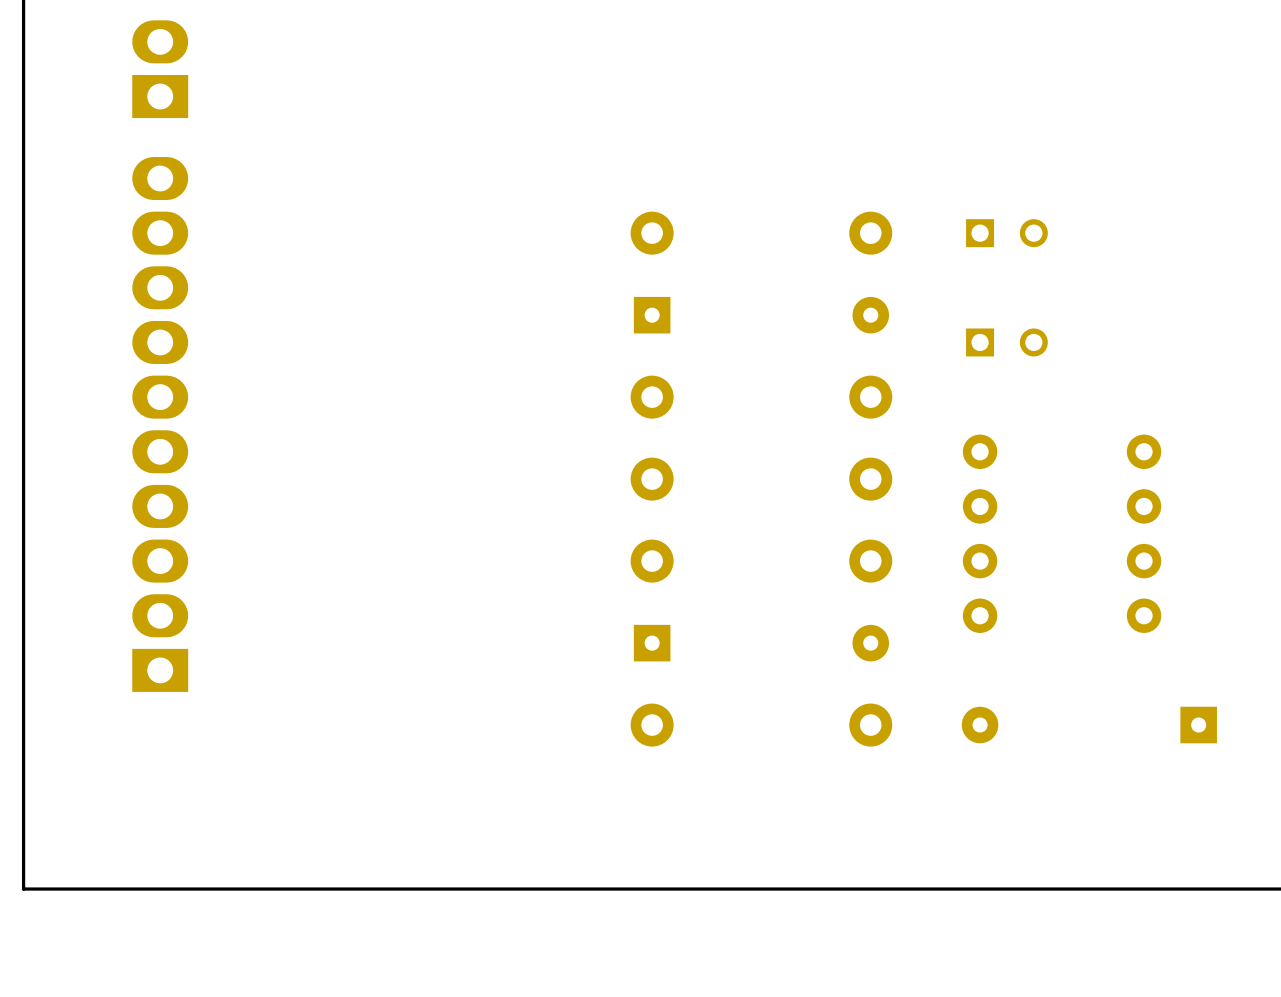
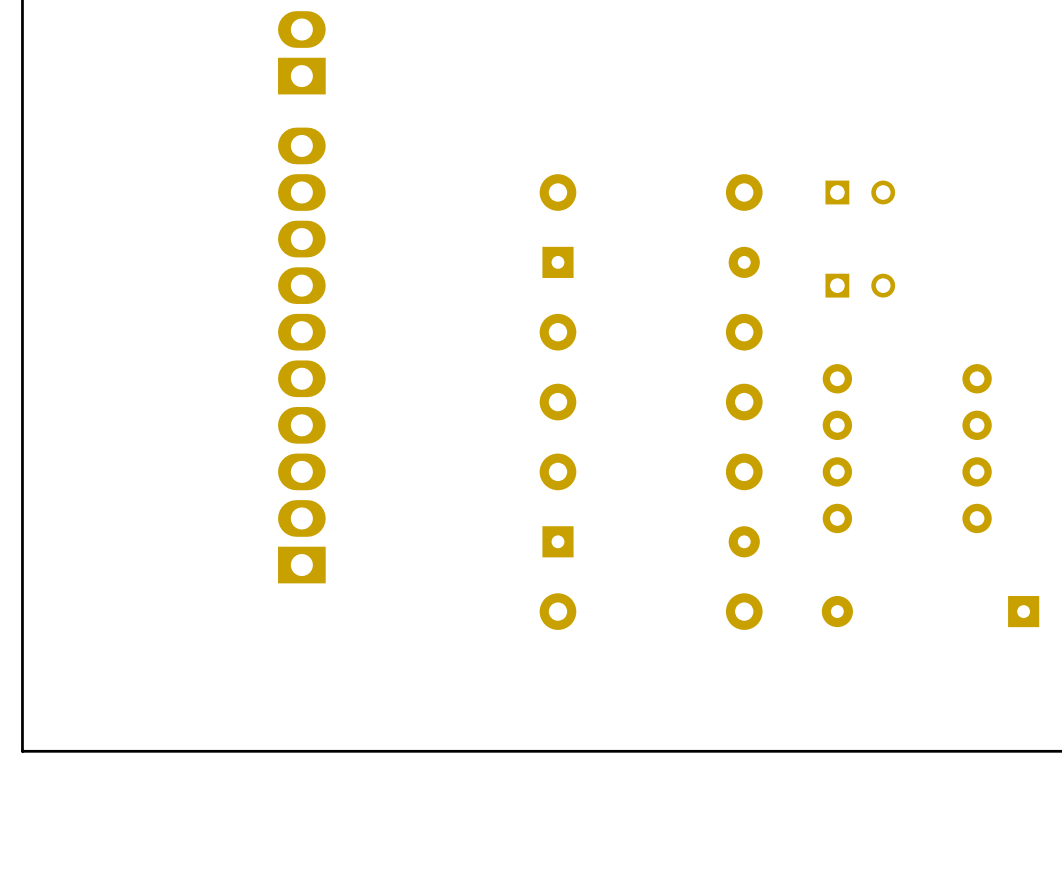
part position: (160, 69) -> (301, 52)
part position: (160, 424) -> (301, 355)

